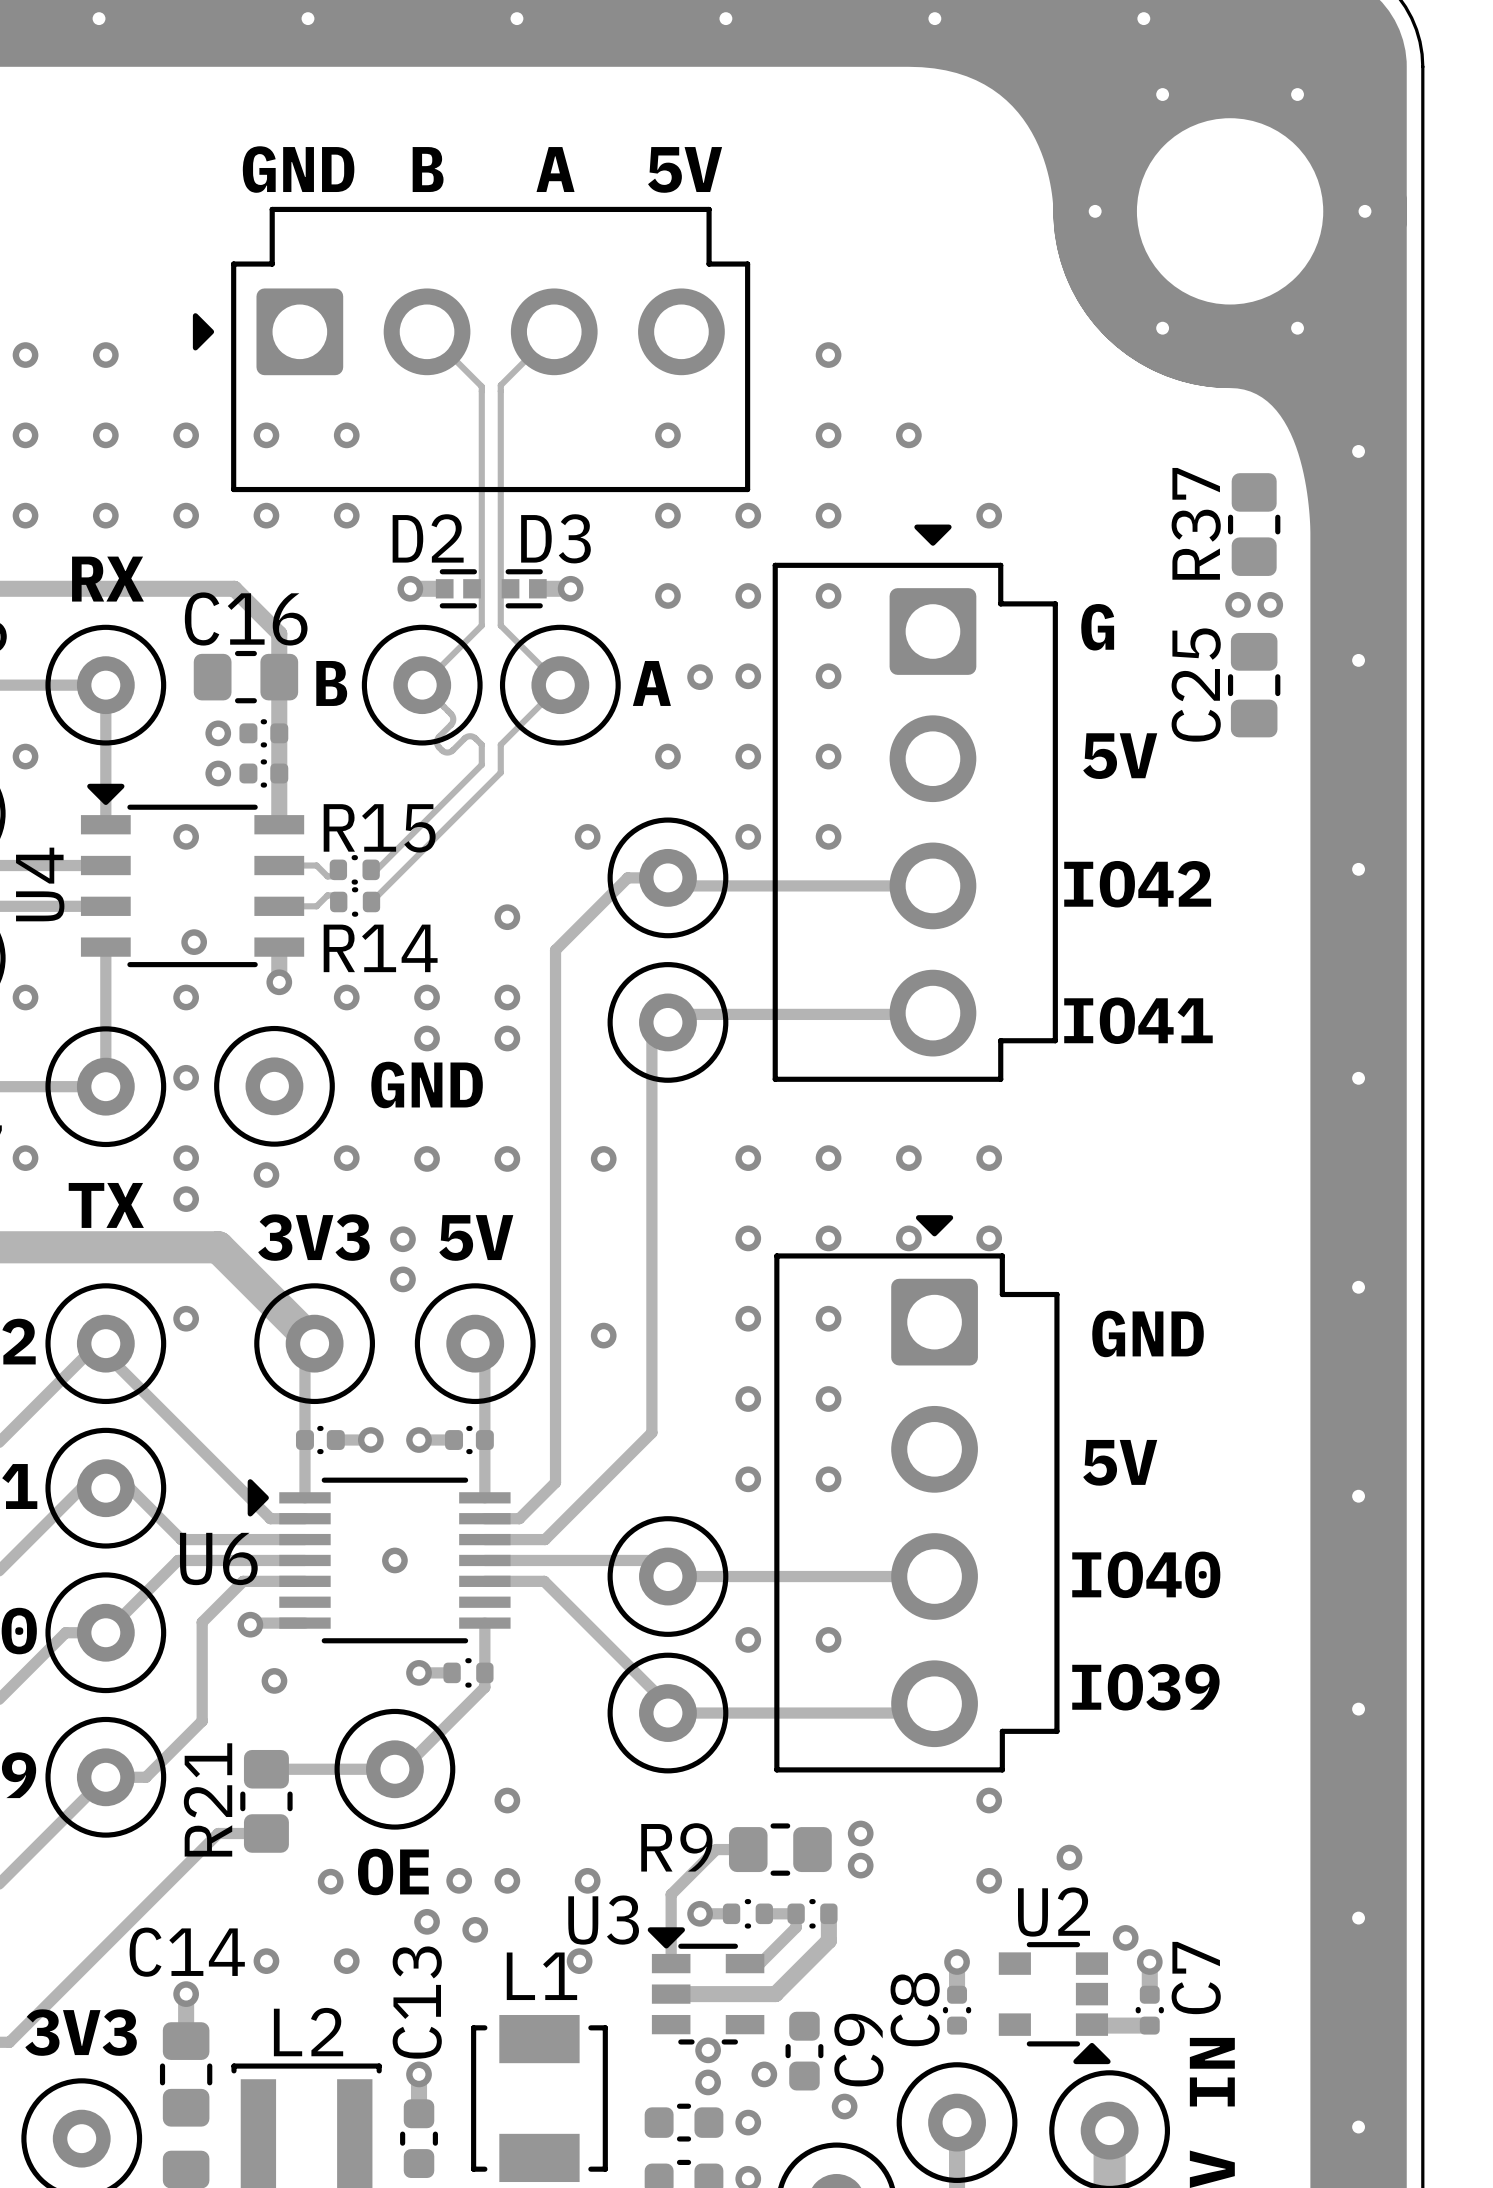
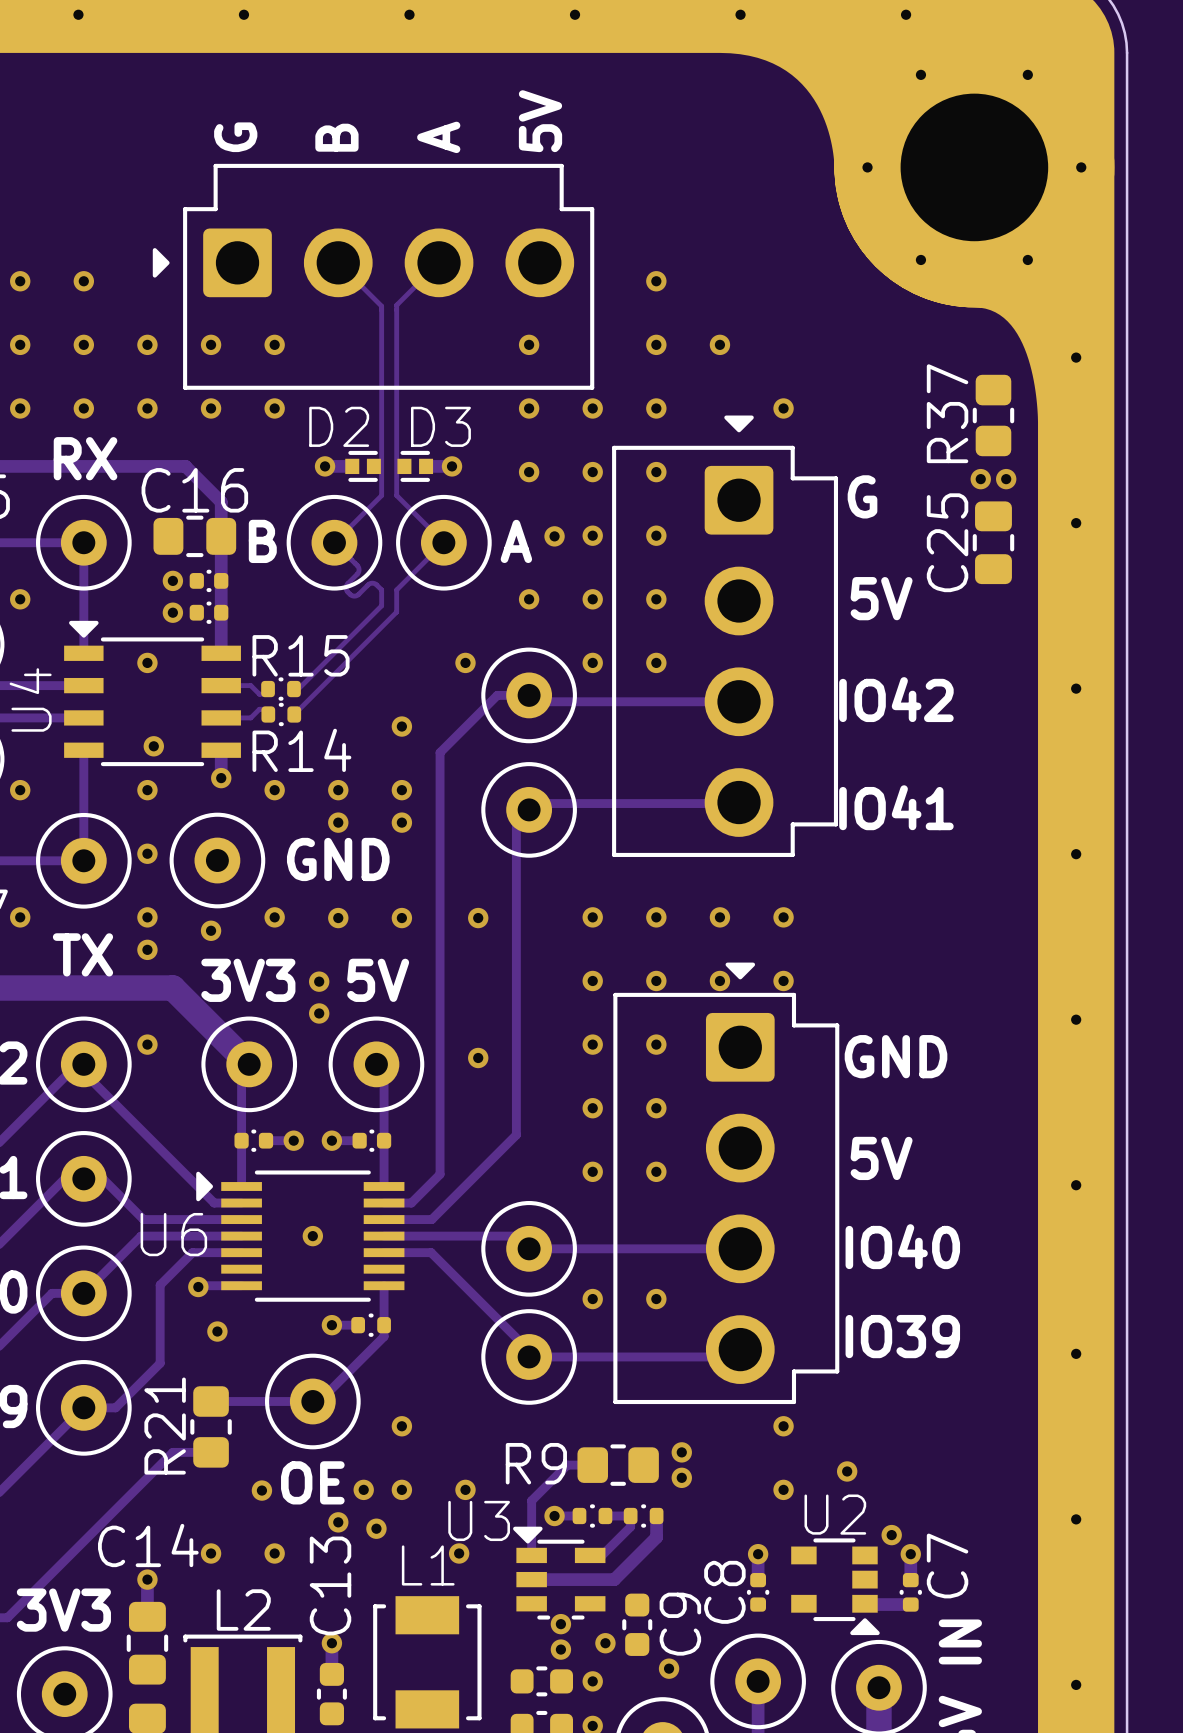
text: GND (298, 169) -> G (235, 137)
text rotation: 0° (428, 169) -> 90° counterclockwise (336, 137)
text rotation: 0° (555, 169) -> 90° counterclockwise (438, 137)
text rotation: 0° (685, 169) -> 90° counterclockwise (540, 121)

